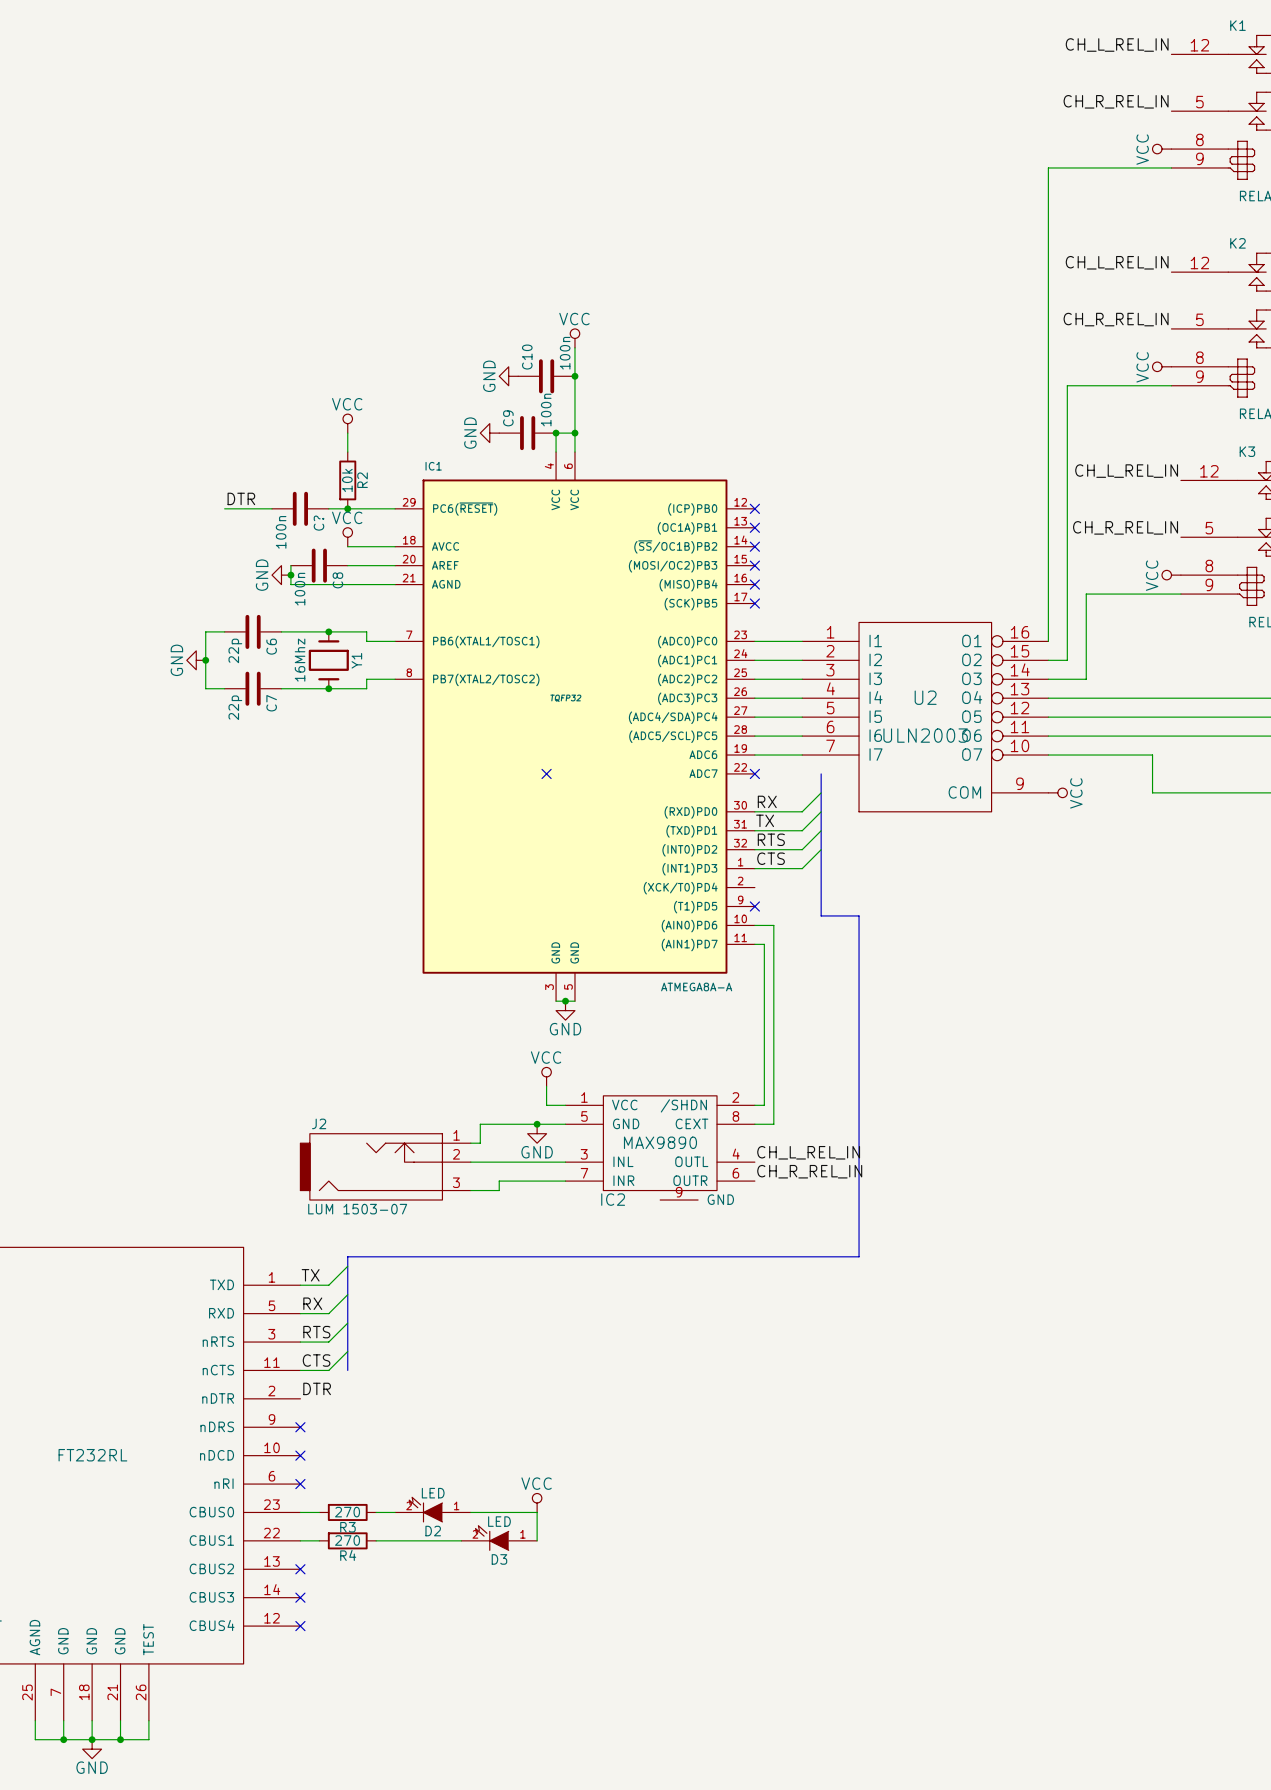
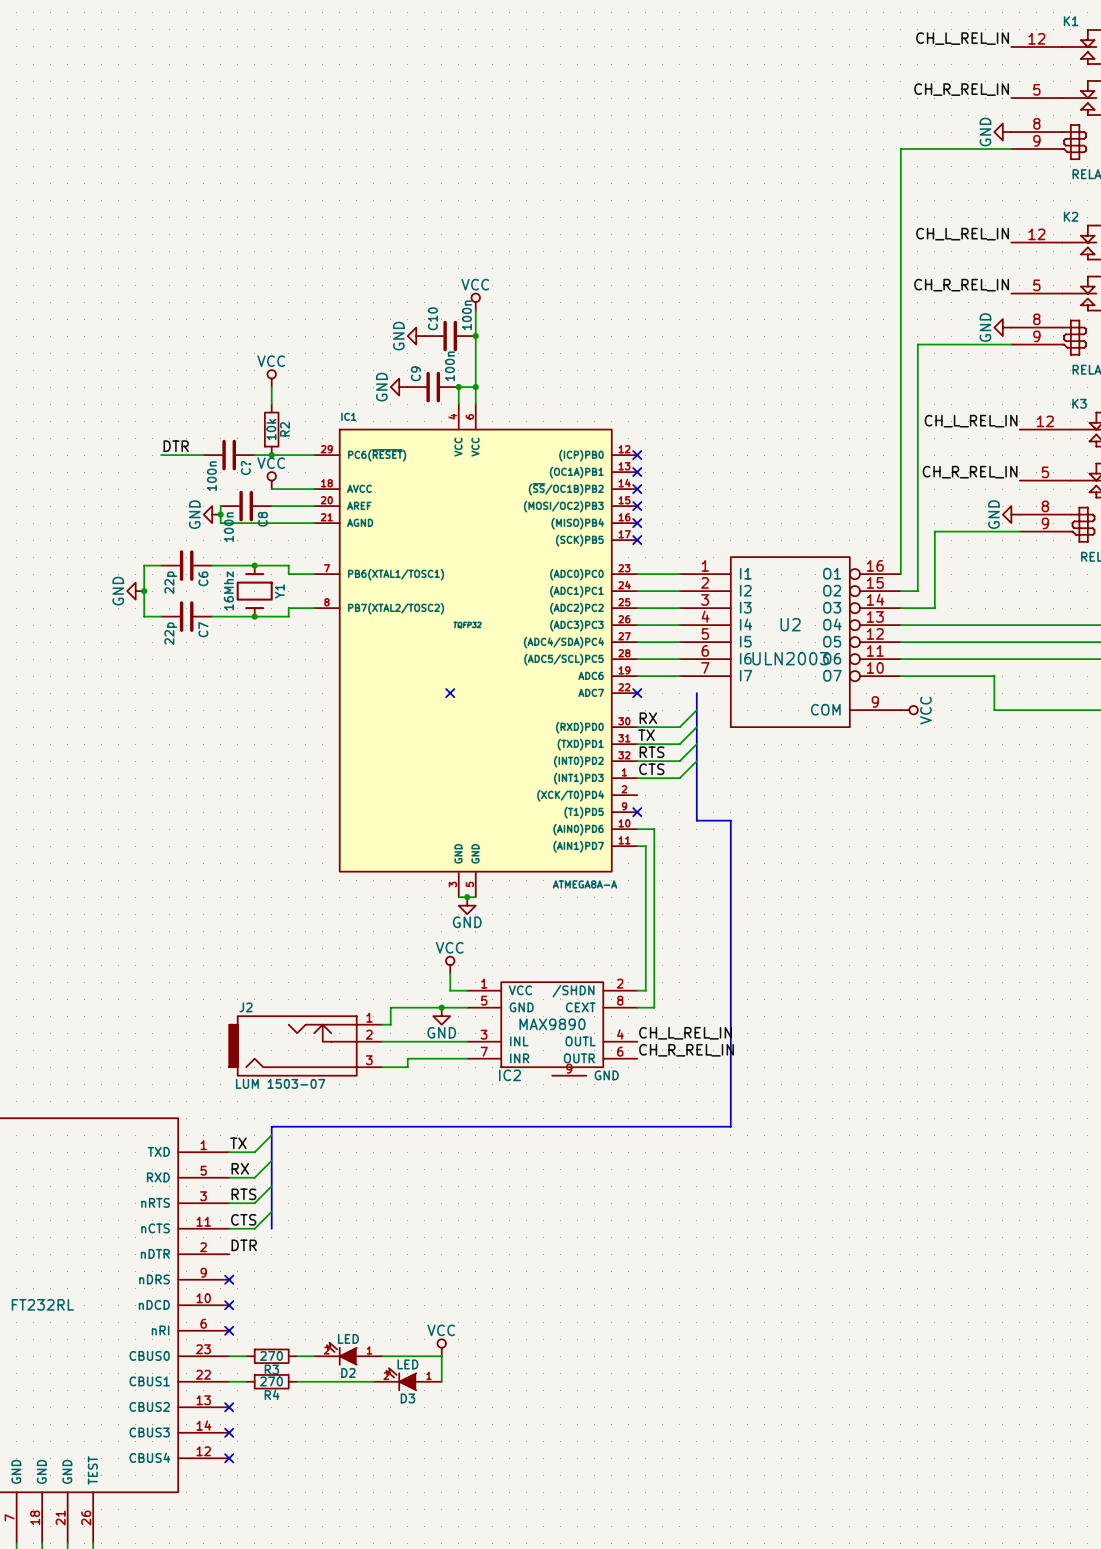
power symbol: VCC (1162, 149) -> GND (1002, 132)
power symbol: VCC (1162, 366) -> GND (1002, 327)
power symbol: VCC (1171, 575) -> GND (1011, 514)

